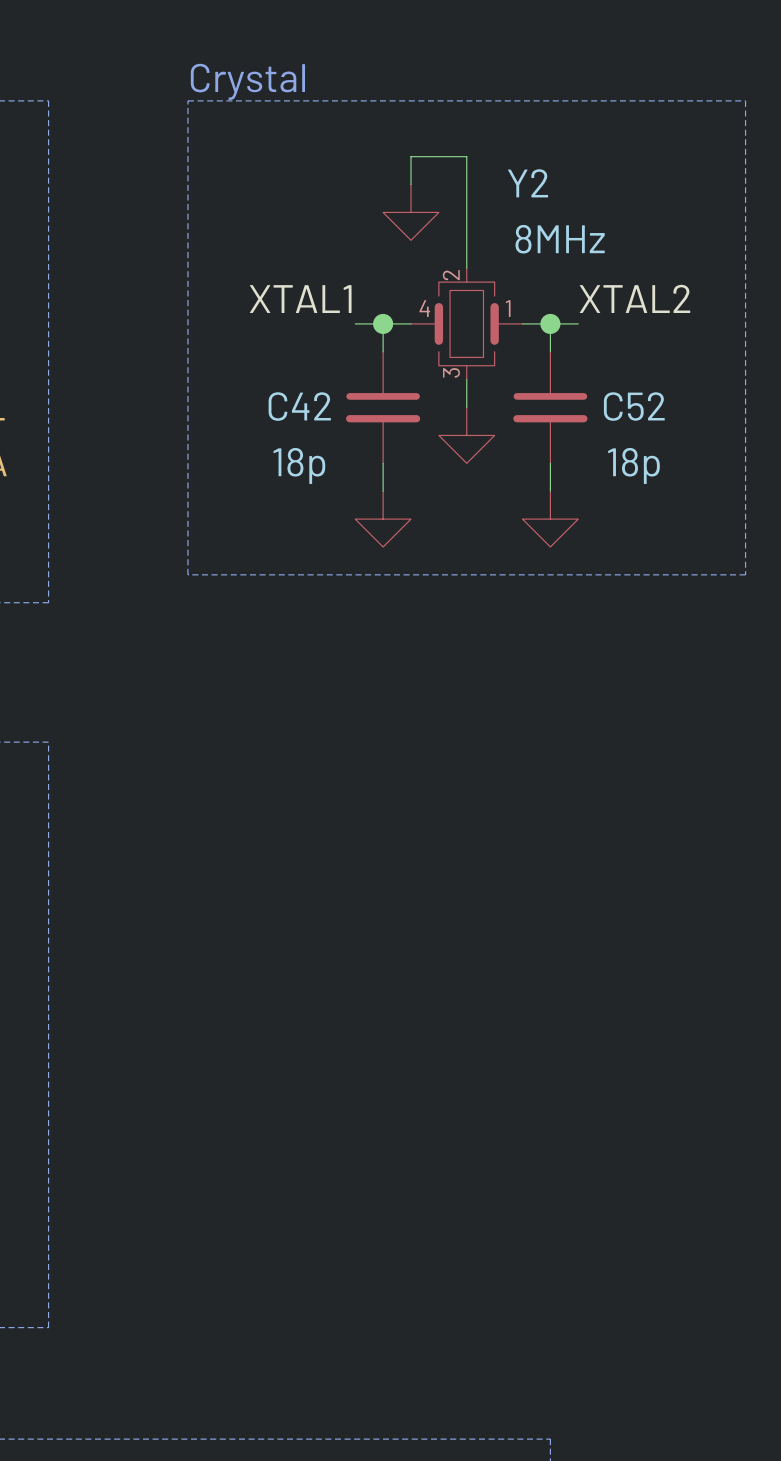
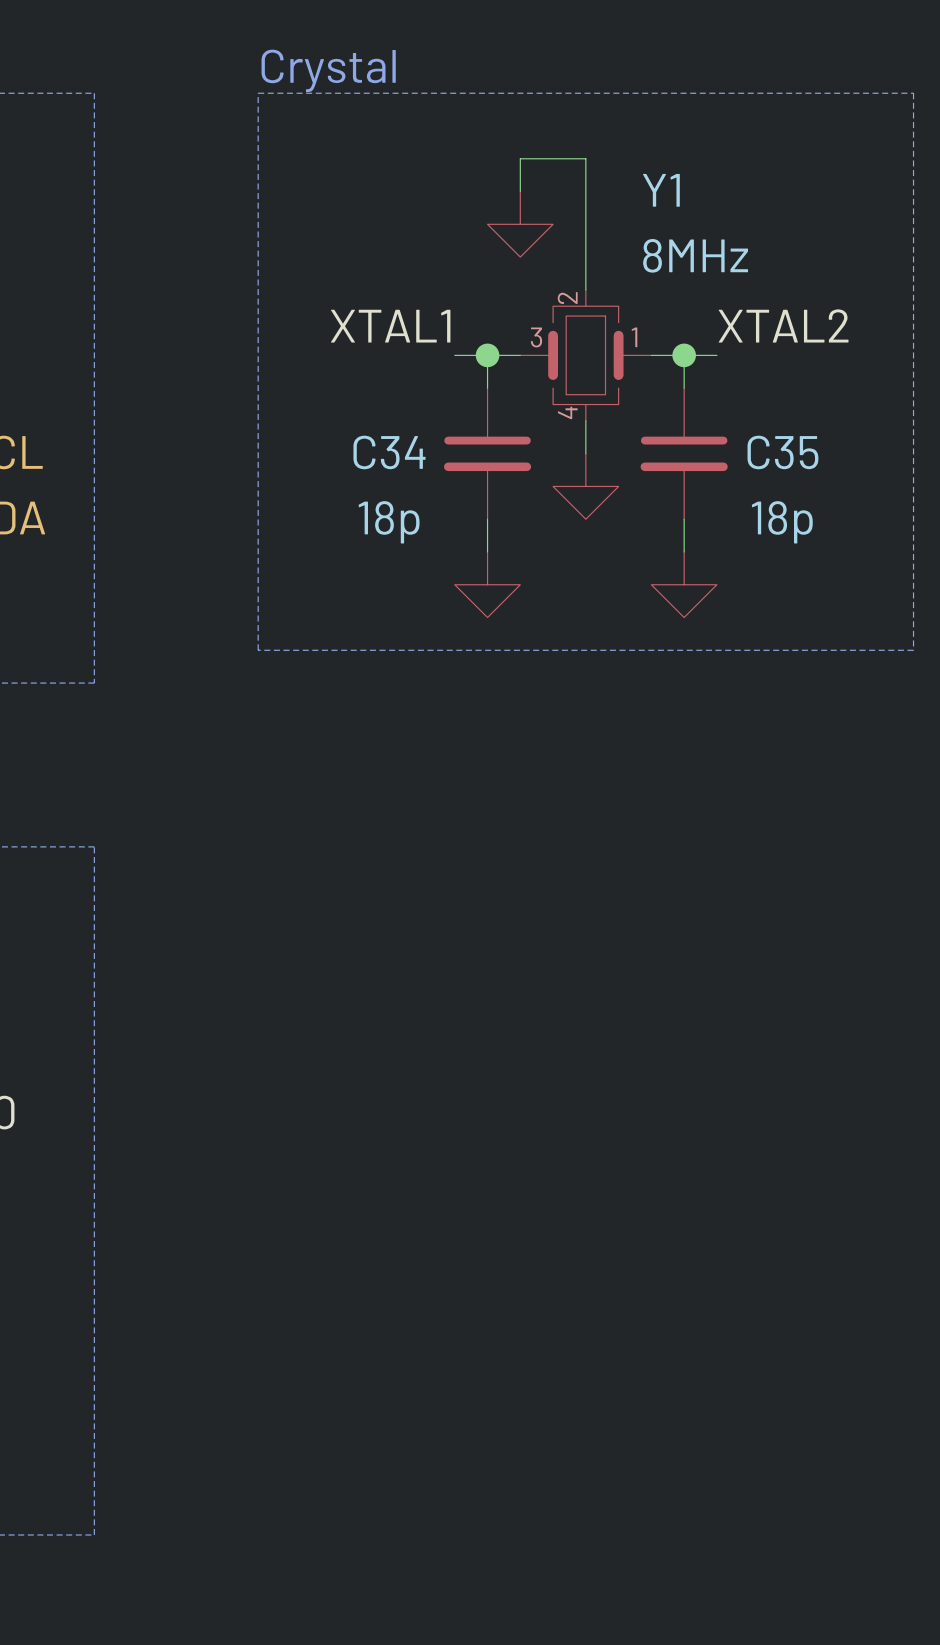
Y2 name: Y2 (528, 183) -> Y1 (661, 190)
Y2 pin number: 4 (424, 308) -> 3 (536, 337)
Y2 pin number: 3 (451, 372) -> 4 (567, 412)
C42 name: C42 (299, 406) -> C34 (389, 452)
C52 name: C52 (634, 406) -> C35 (782, 452)

